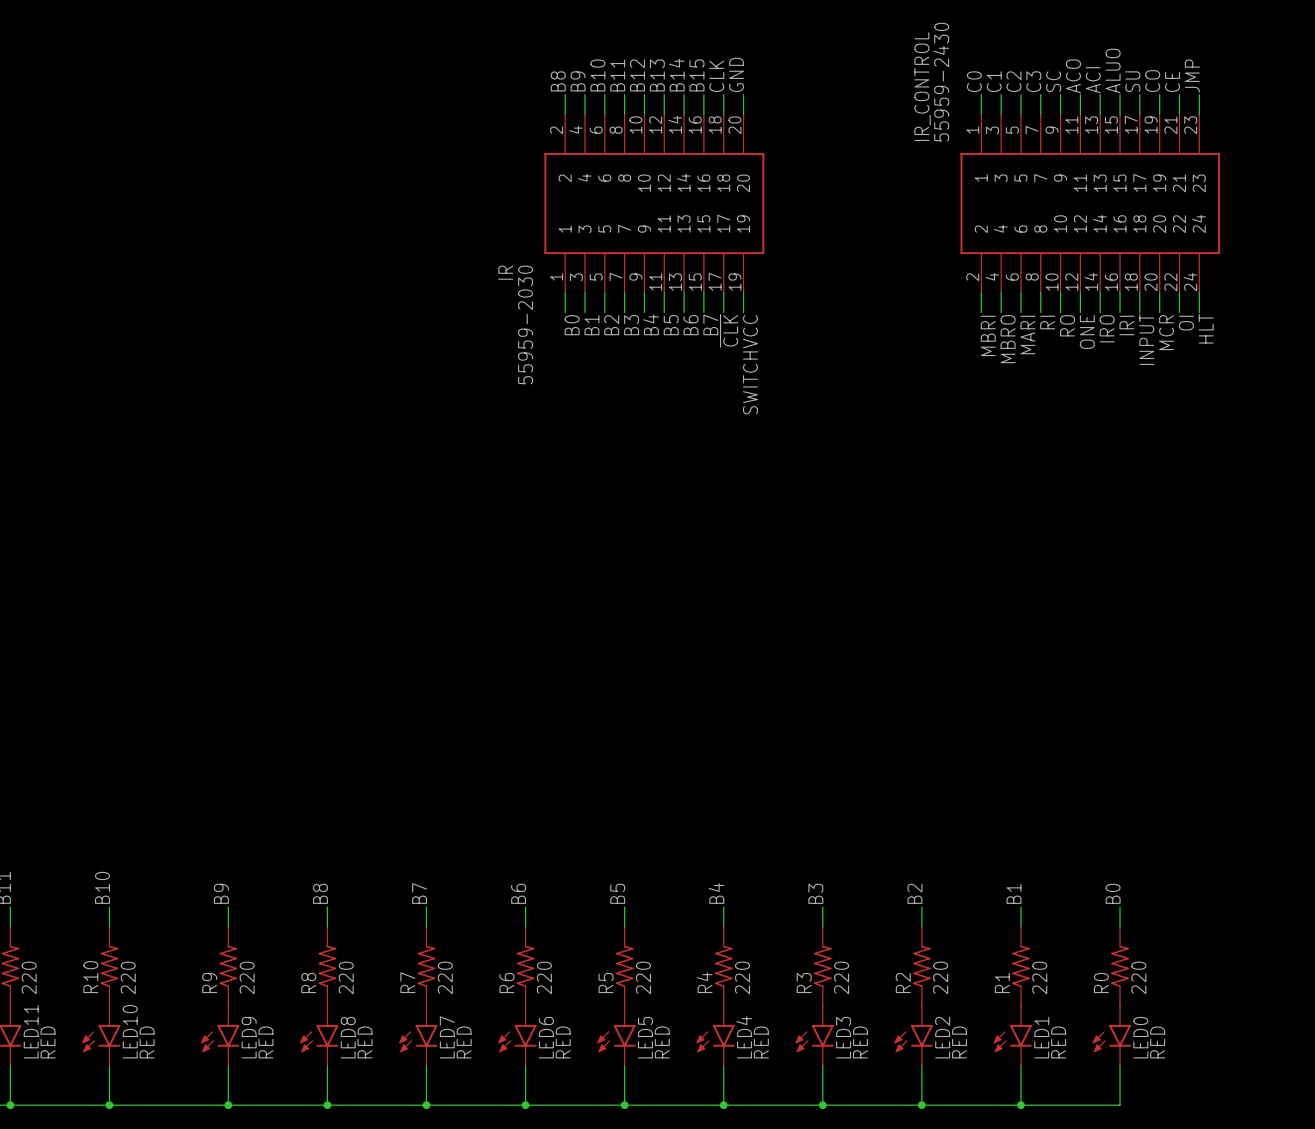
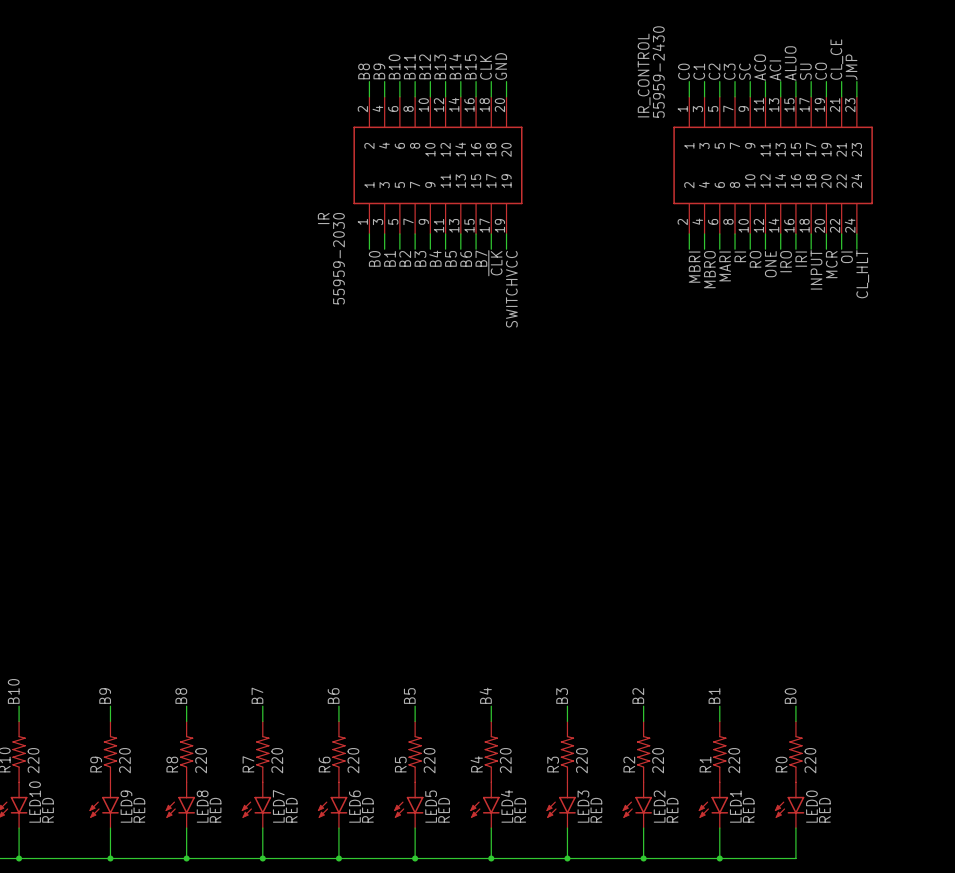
label: CE (1172, 81) -> CL_CE (836, 59)
label: HLT (1206, 328) -> CL_HLT (862, 274)

